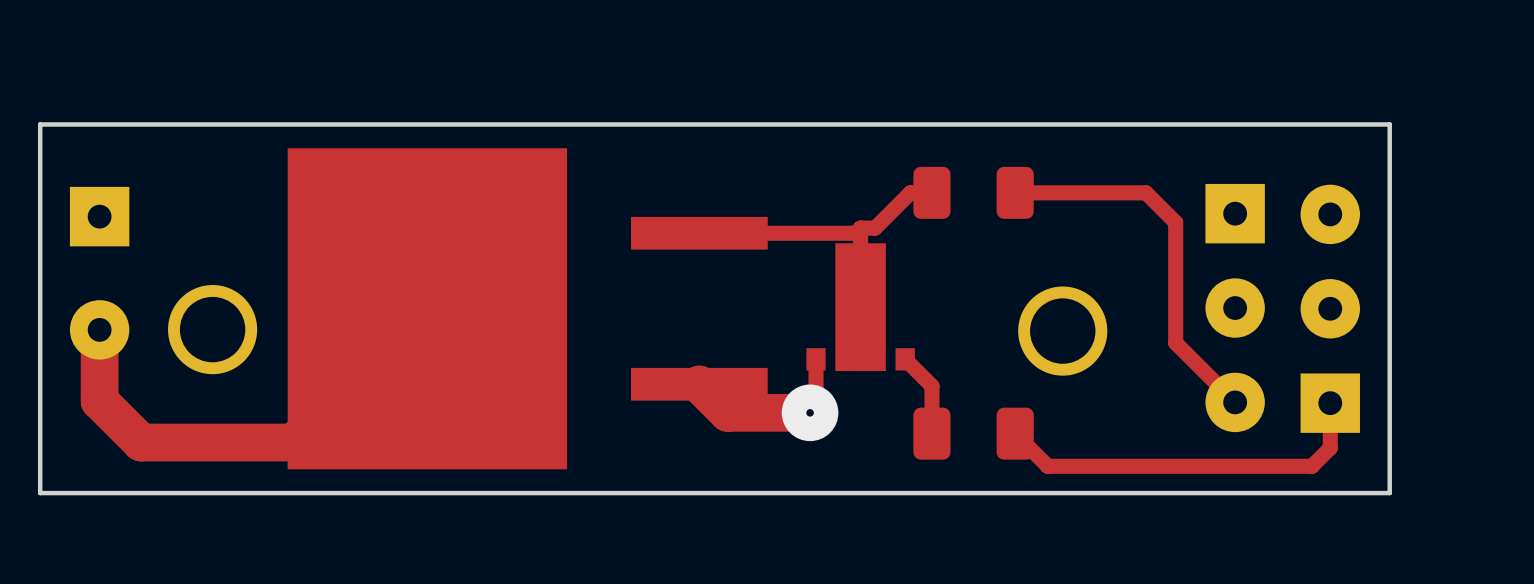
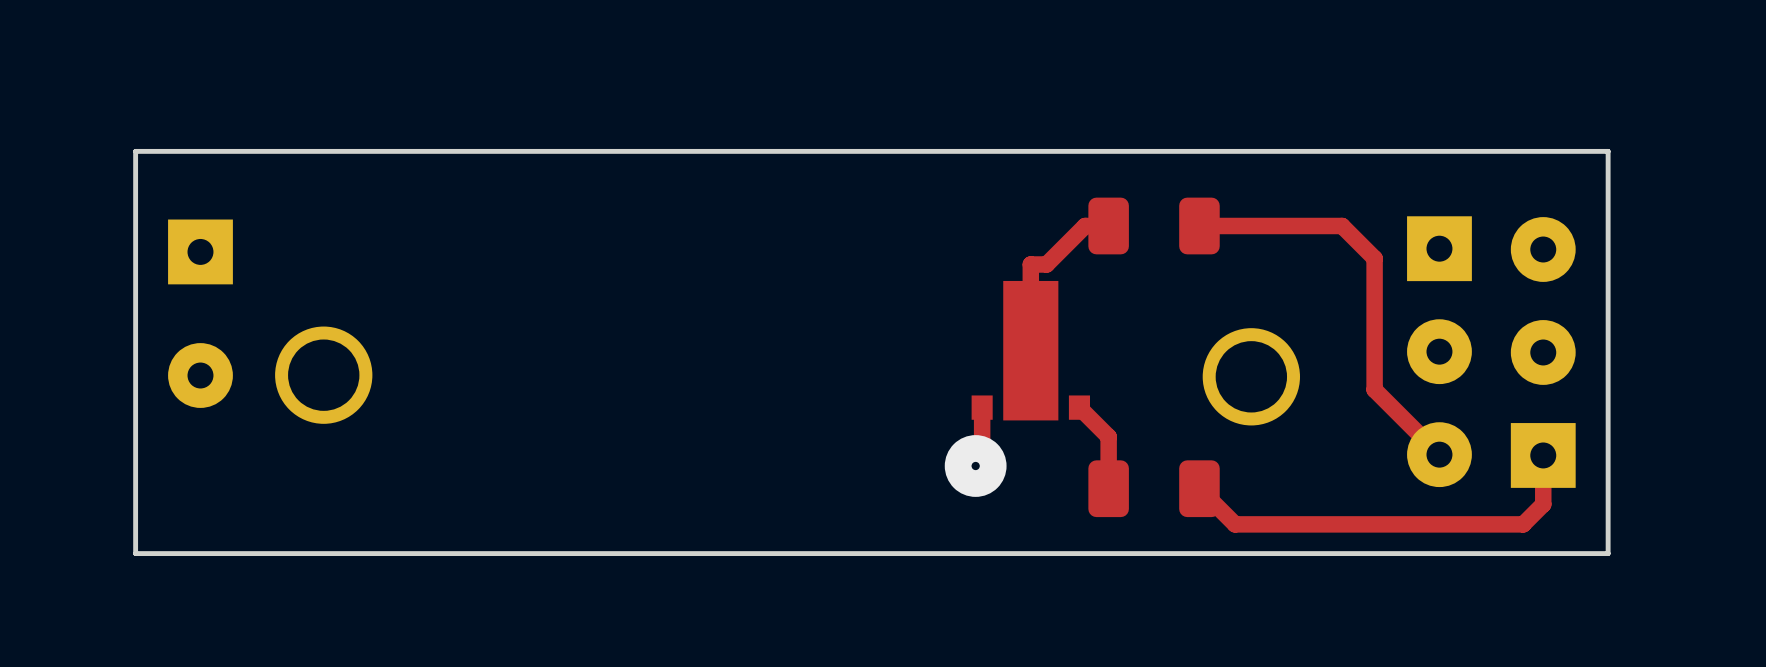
top track: (860, 228) (855, 233) (699, 233) -> none
top track: (427, 308) (293, 442) (141, 442) (99, 400) (99, 329) -> none
part: (527, 308) -> none
top track: (699, 384) (727, 412) (810, 412) -> none

